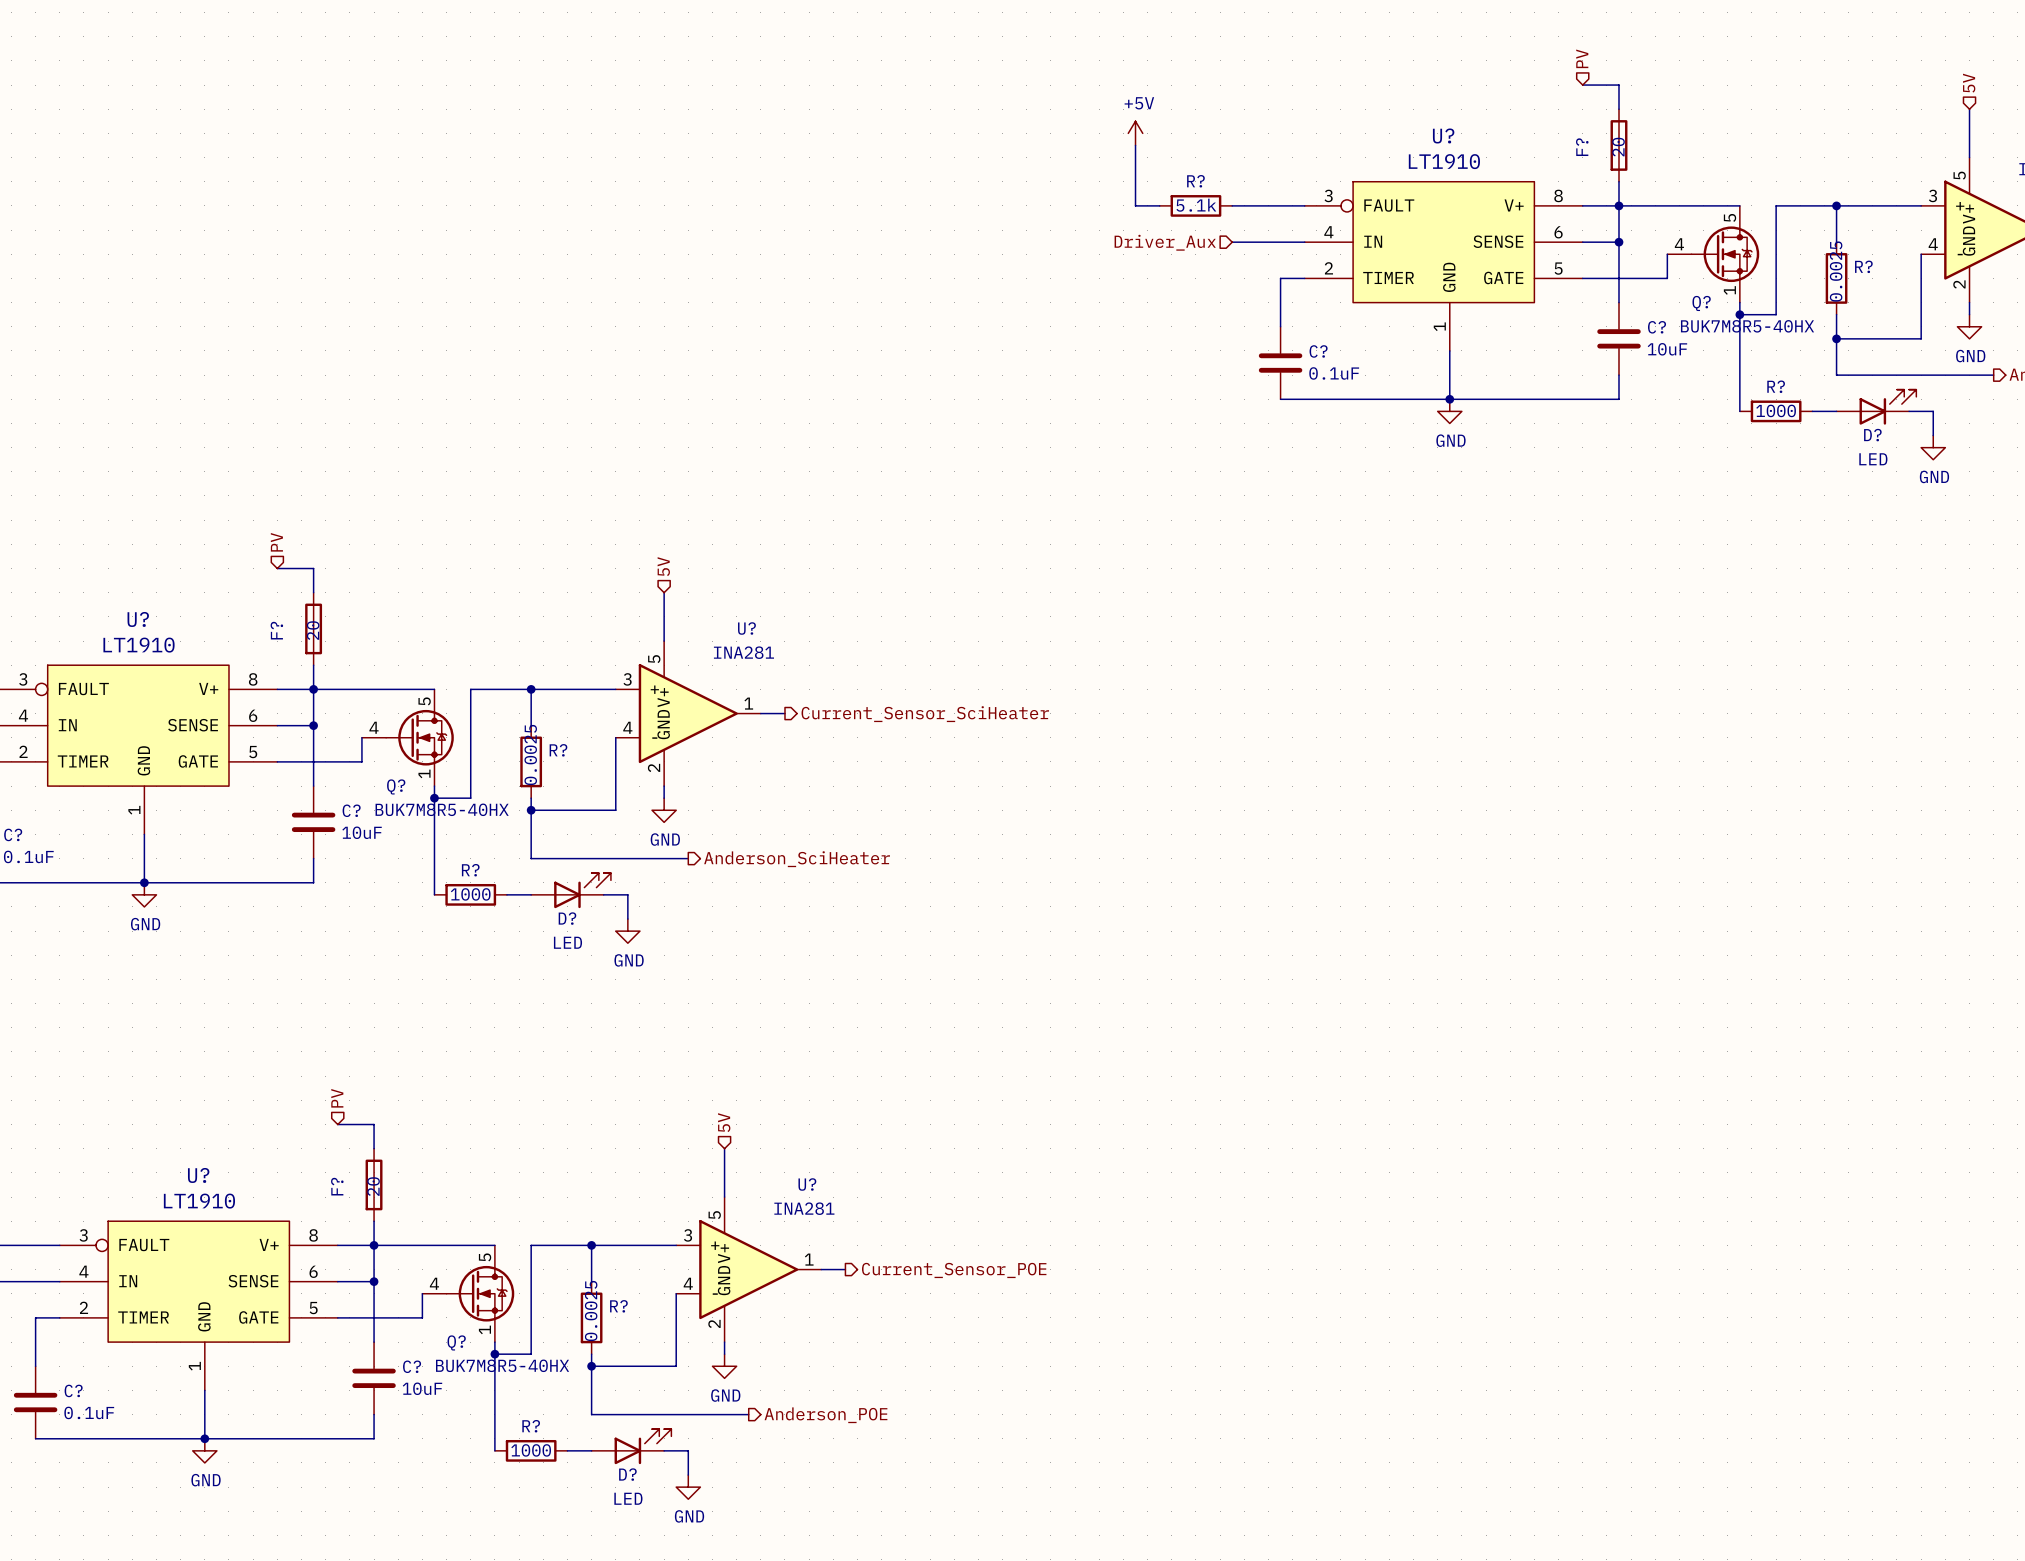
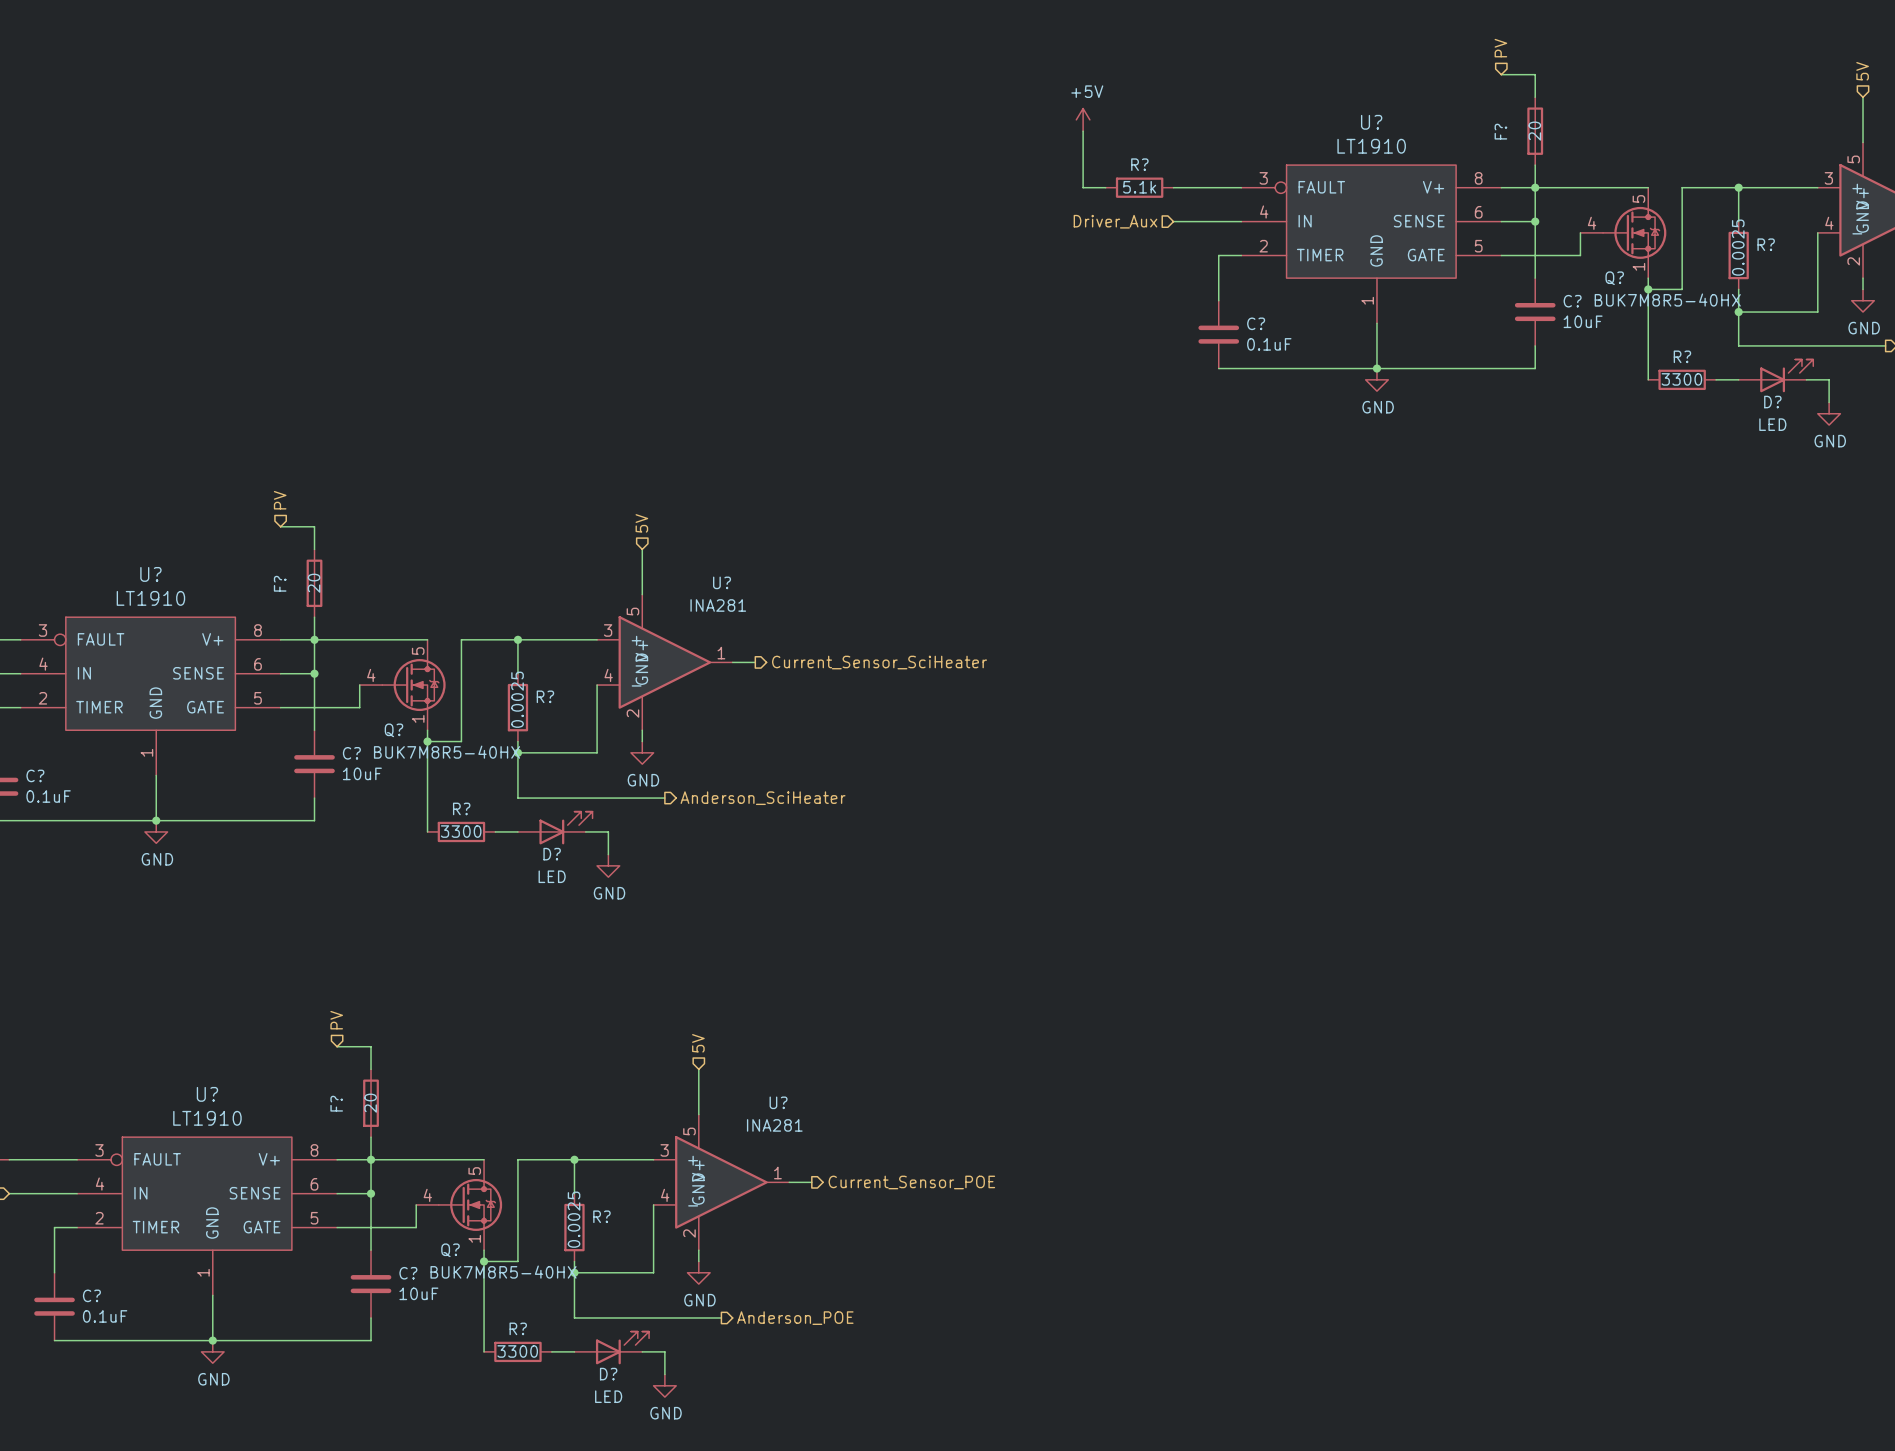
R? value: 1000 (1776, 410) -> 3300 (1681, 379)
R? value: 1000 (470, 894) -> 3300 (461, 831)
R? value: 1000 (531, 1450) -> 3300 (517, 1351)

